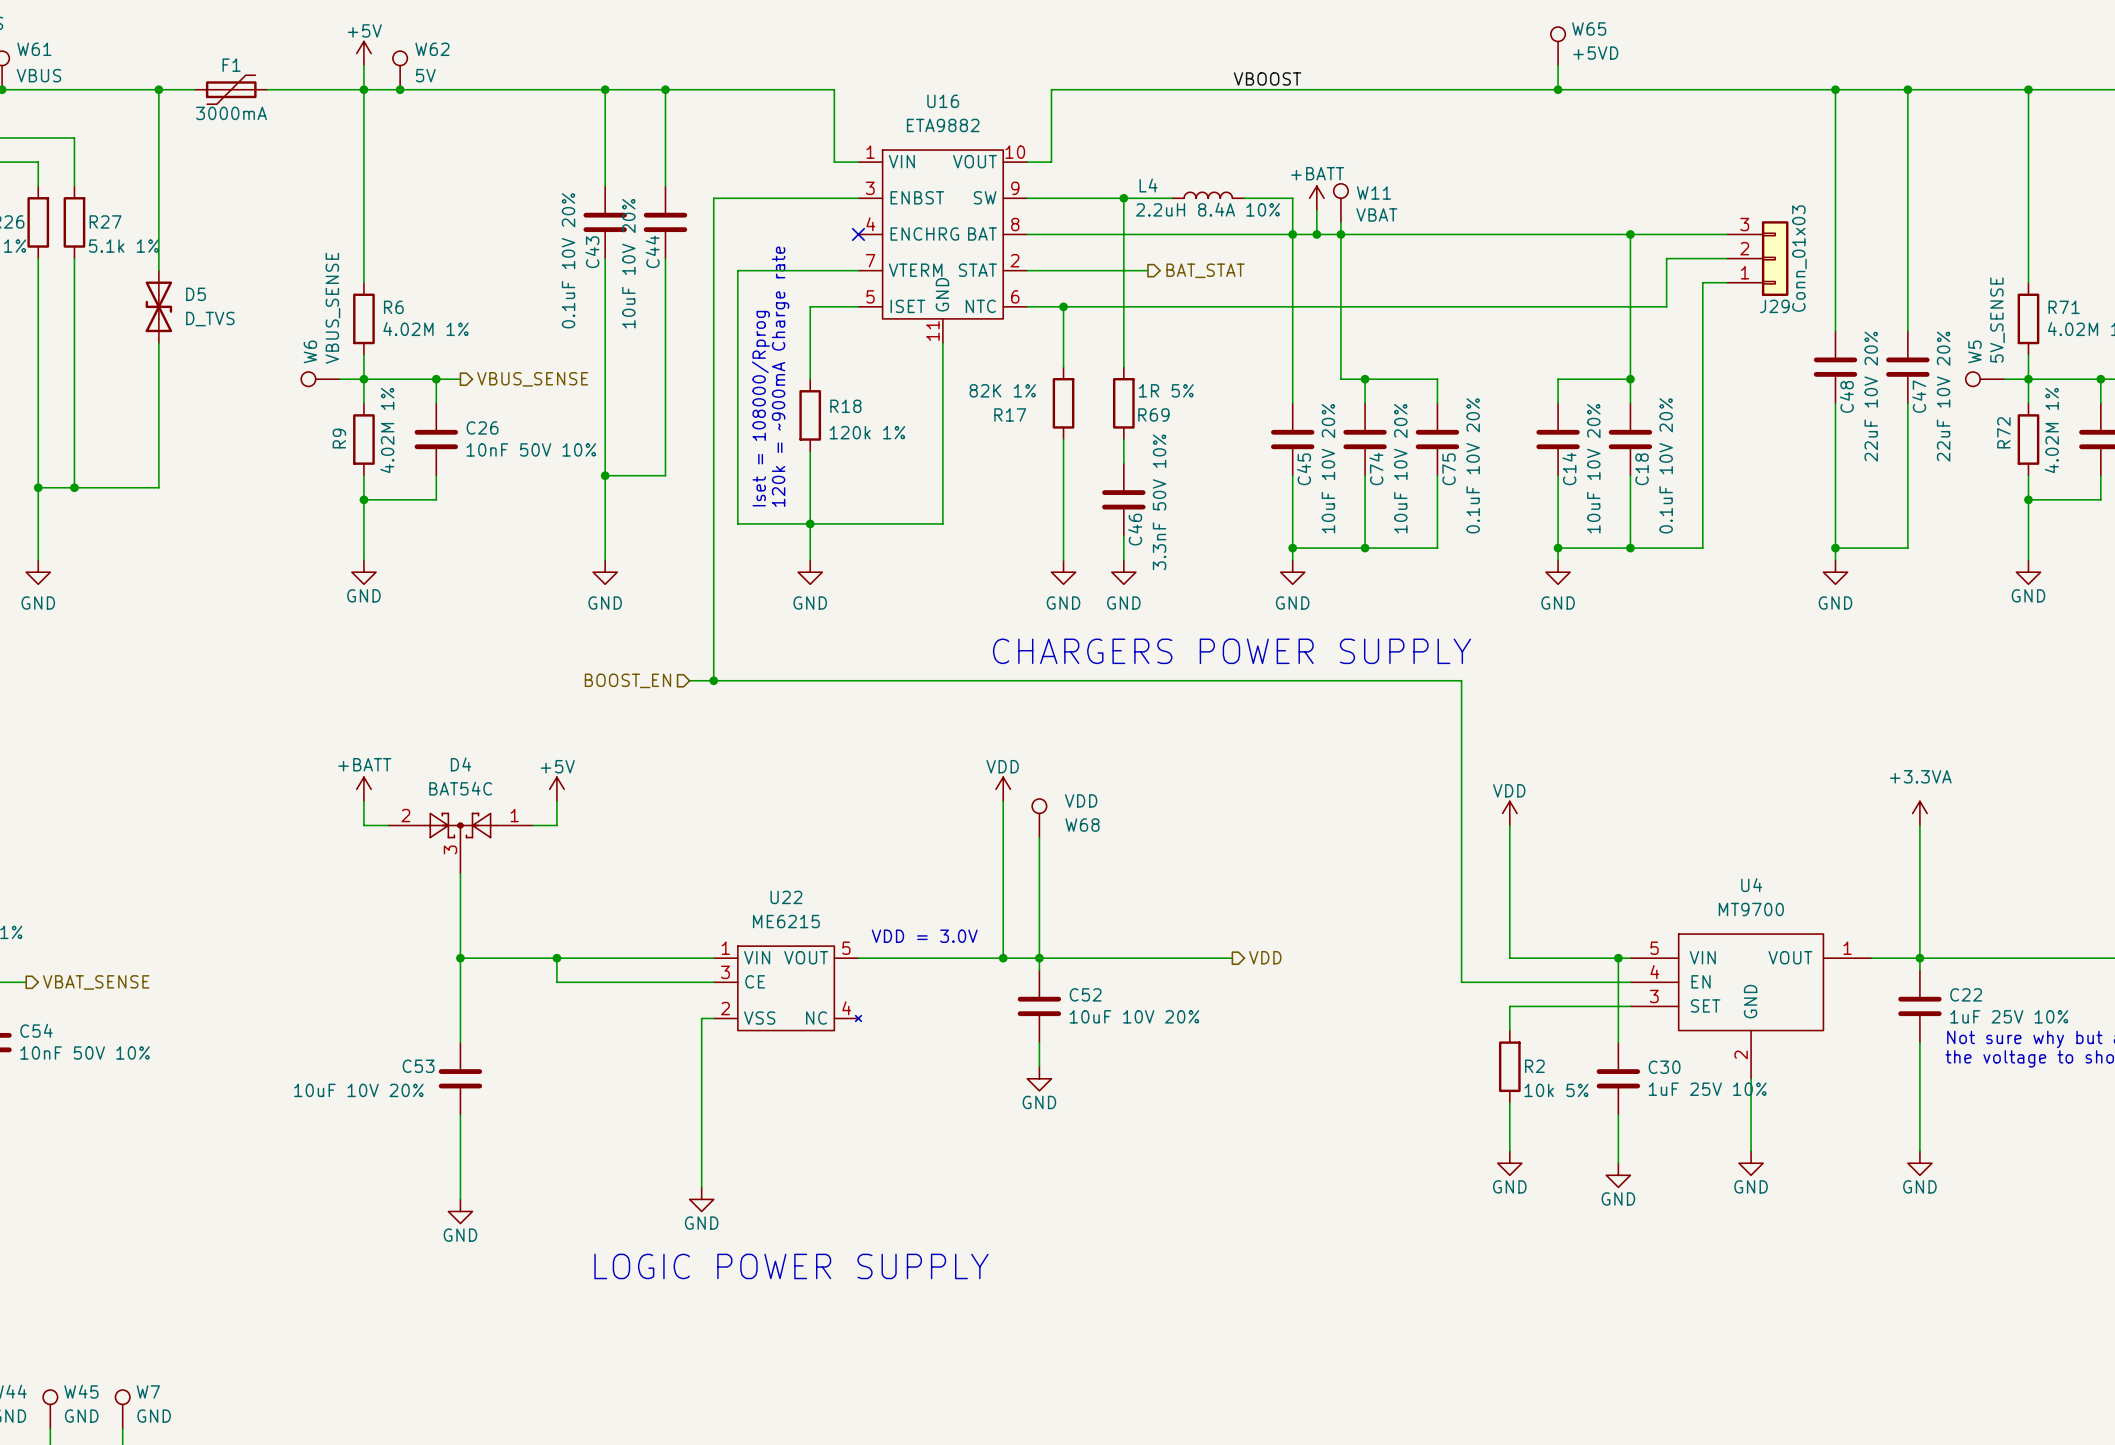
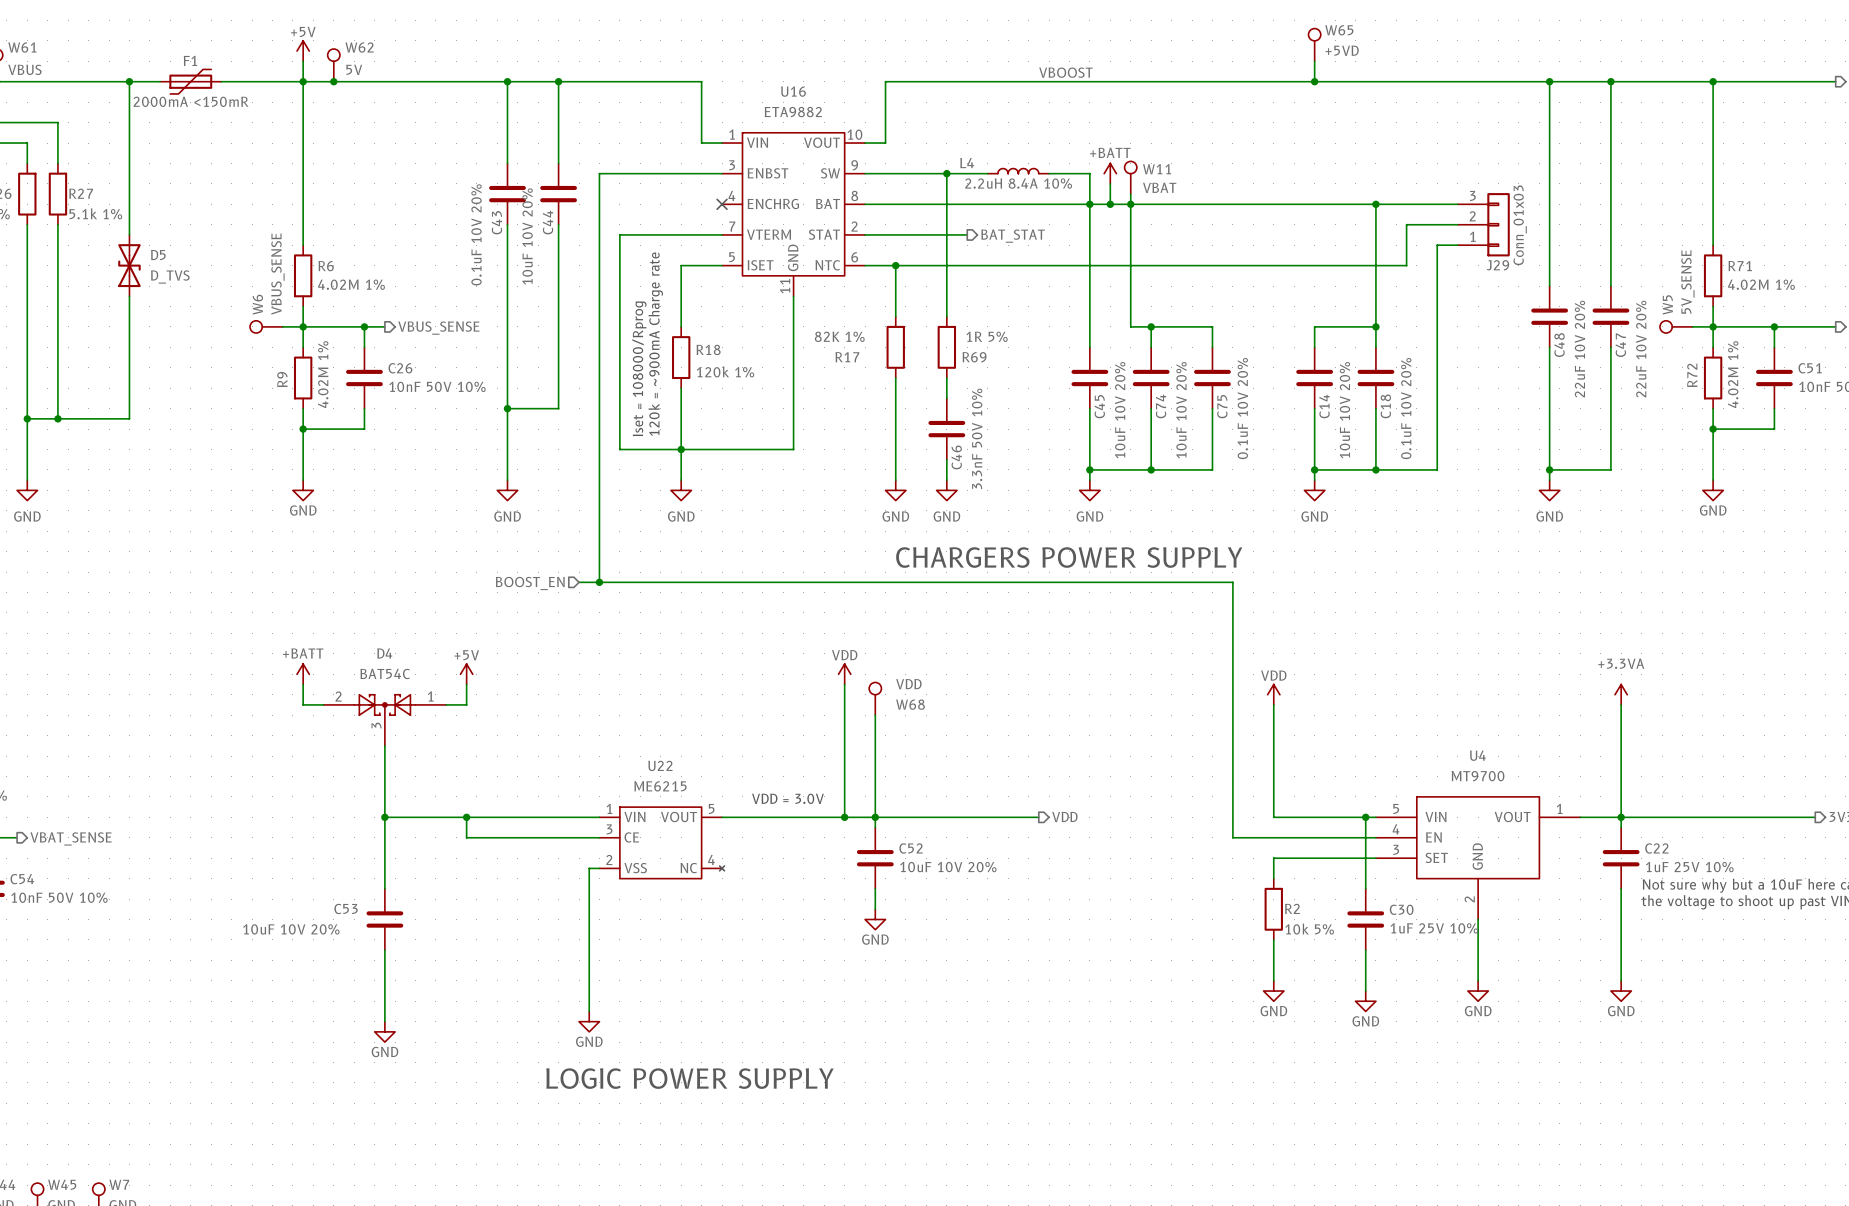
F1 value: 3000mA (231, 113) -> 2000mA <150mR (191, 101)

